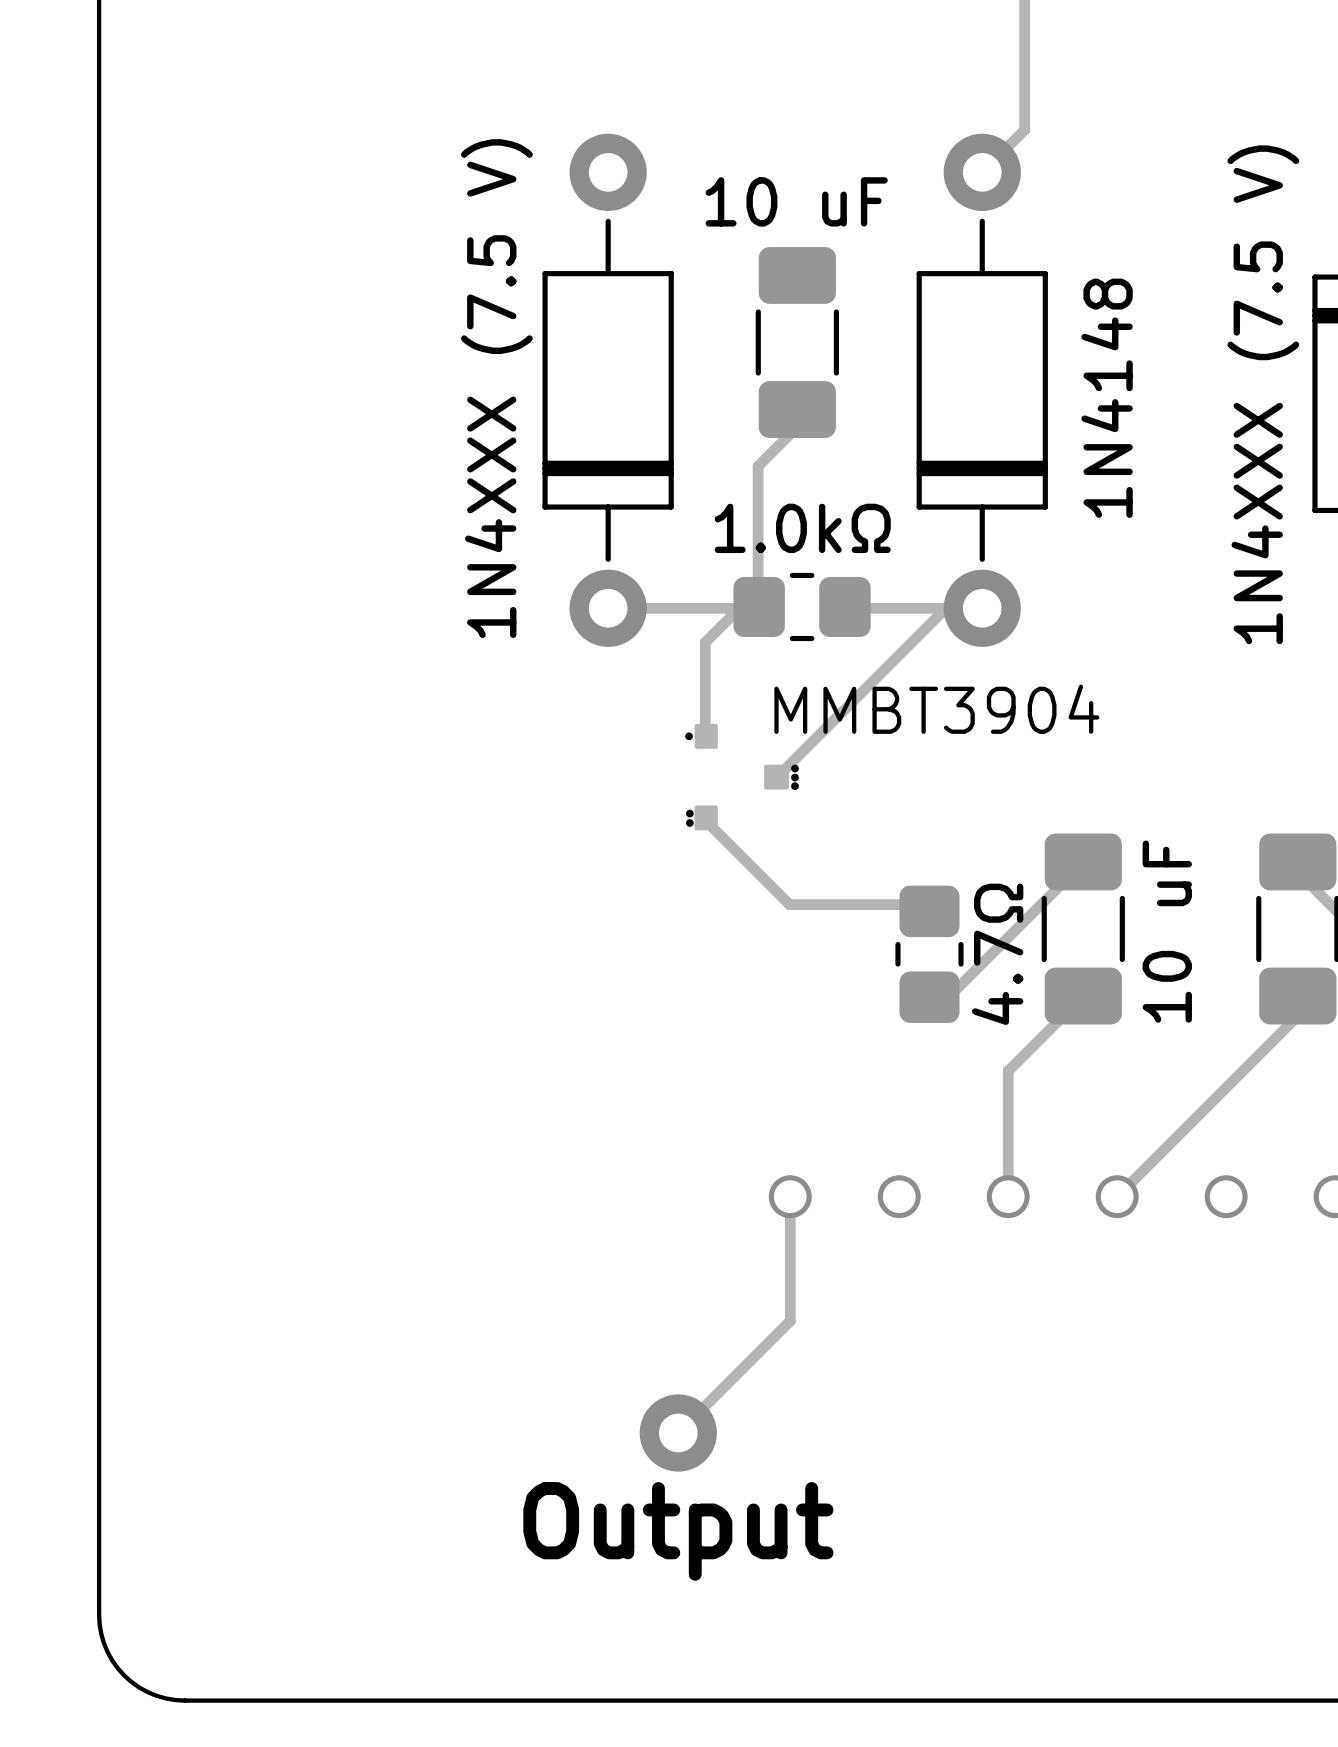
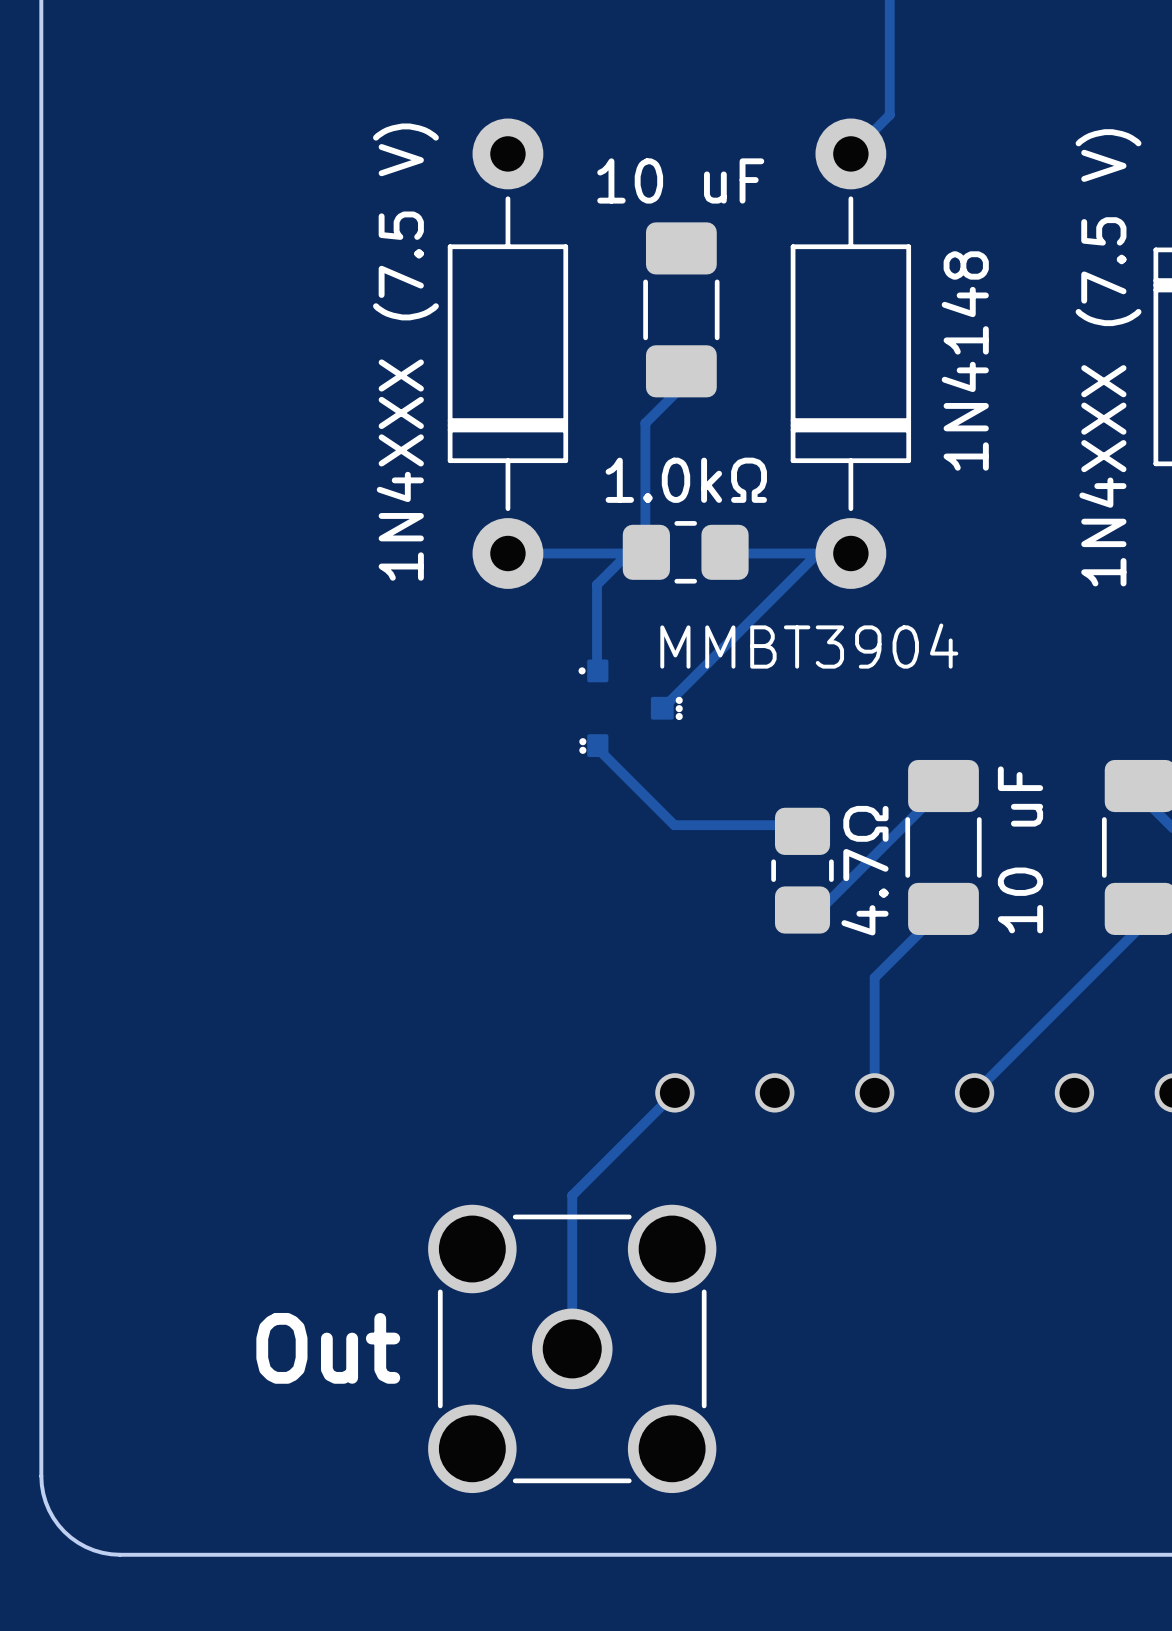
track: (790, 1196) (790, 1321) (678, 1432) -> (674, 1092) (572, 1195) (572, 1348)
part: (678, 1432) -> none
part: none -> (572, 1348)
text: Output (678, 1531) -> Out (328, 1348)

